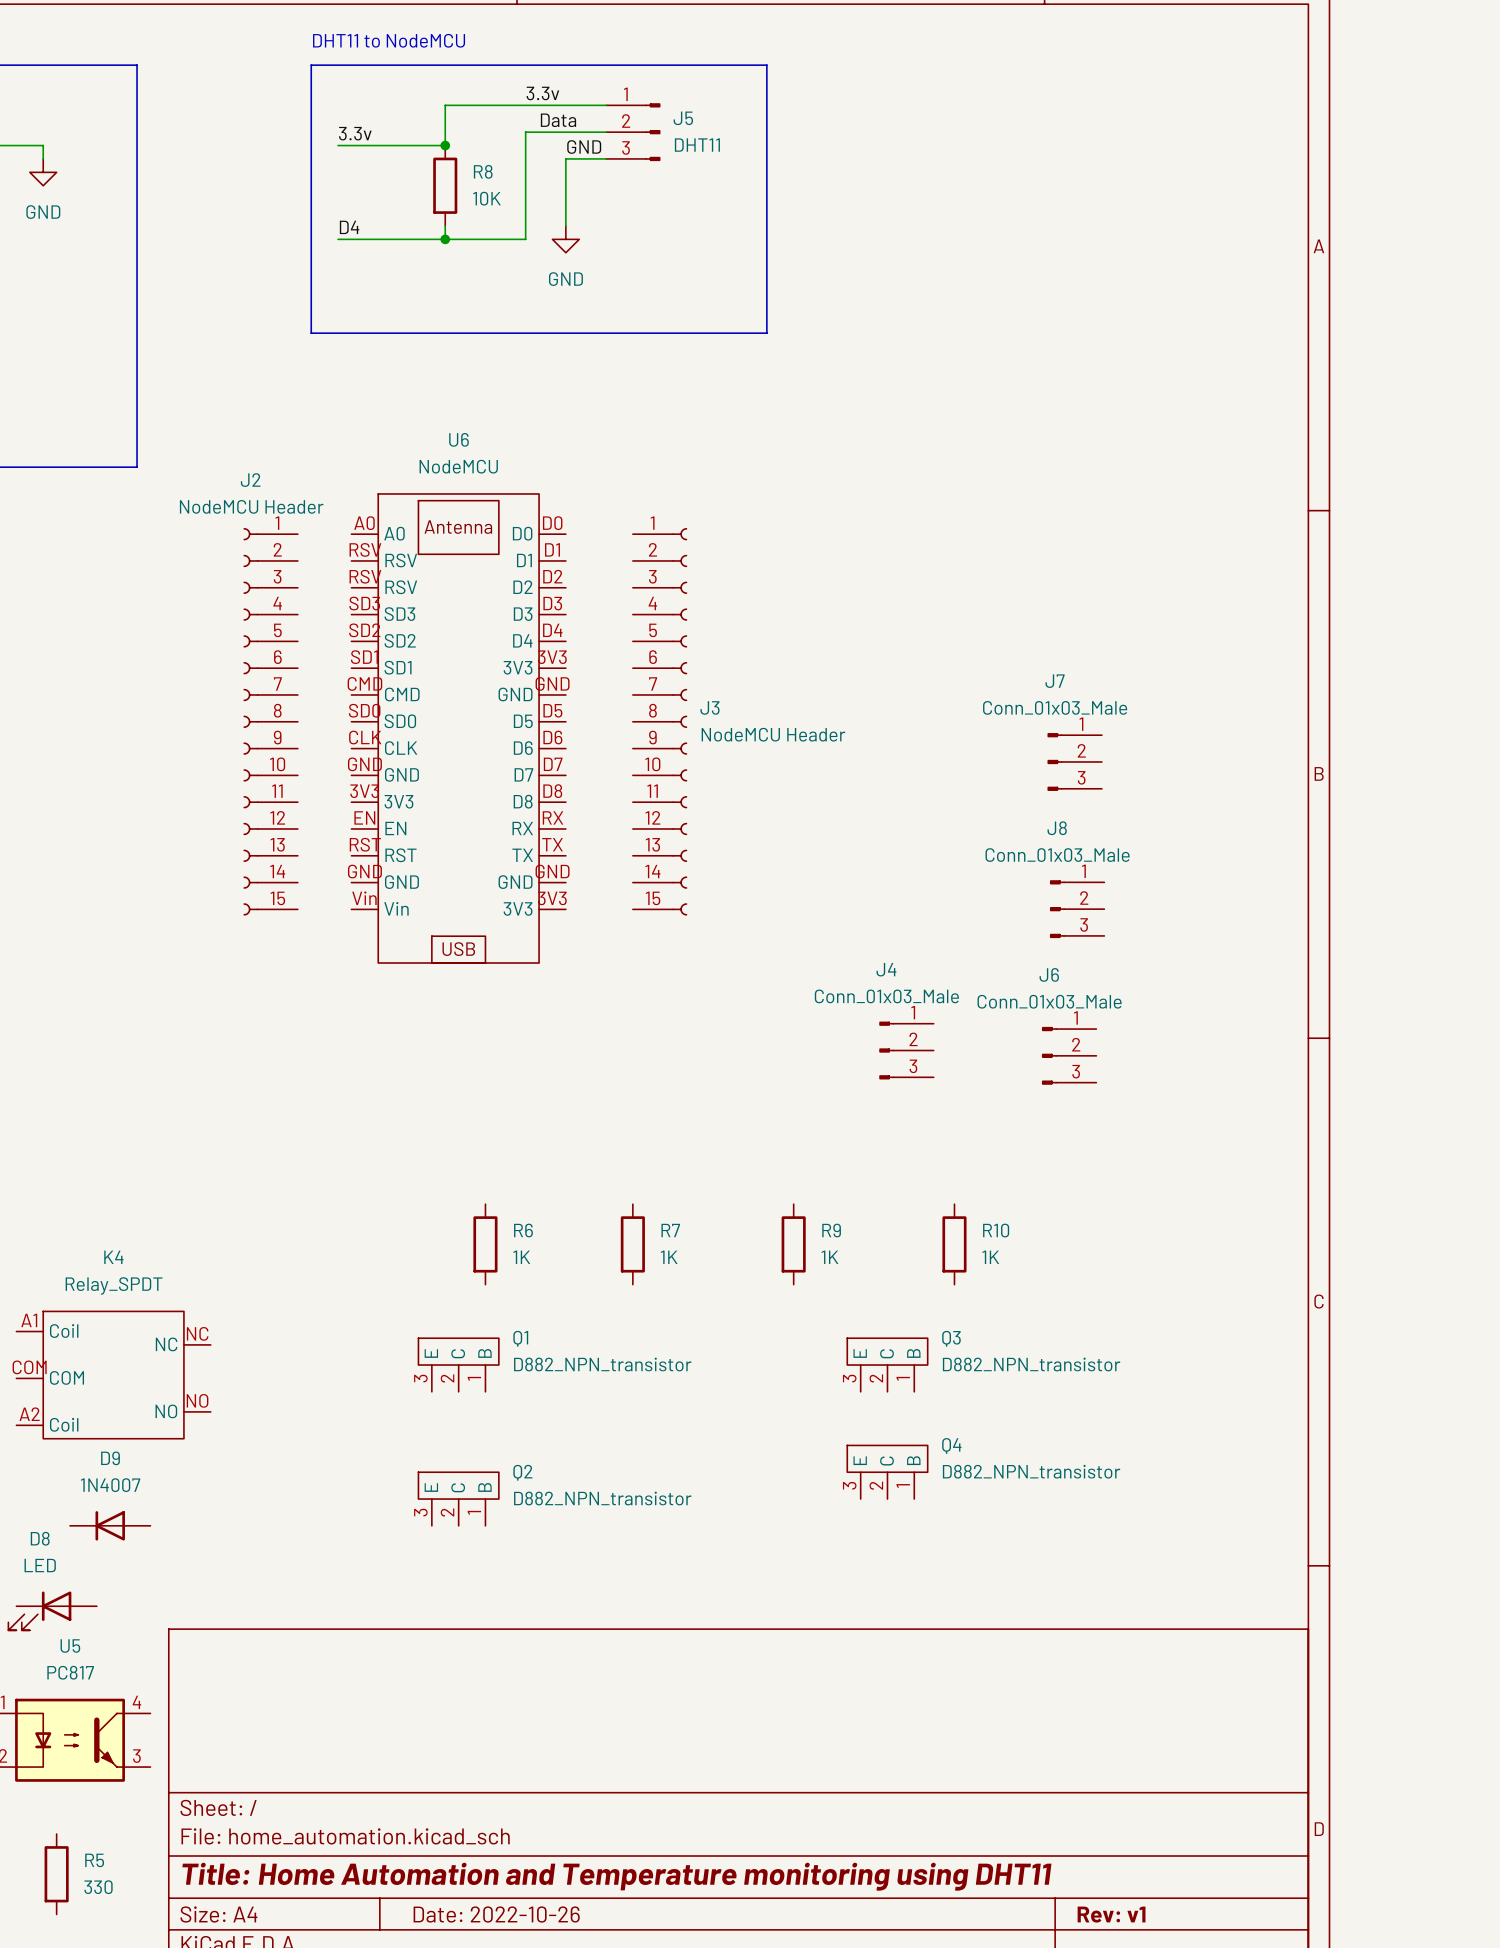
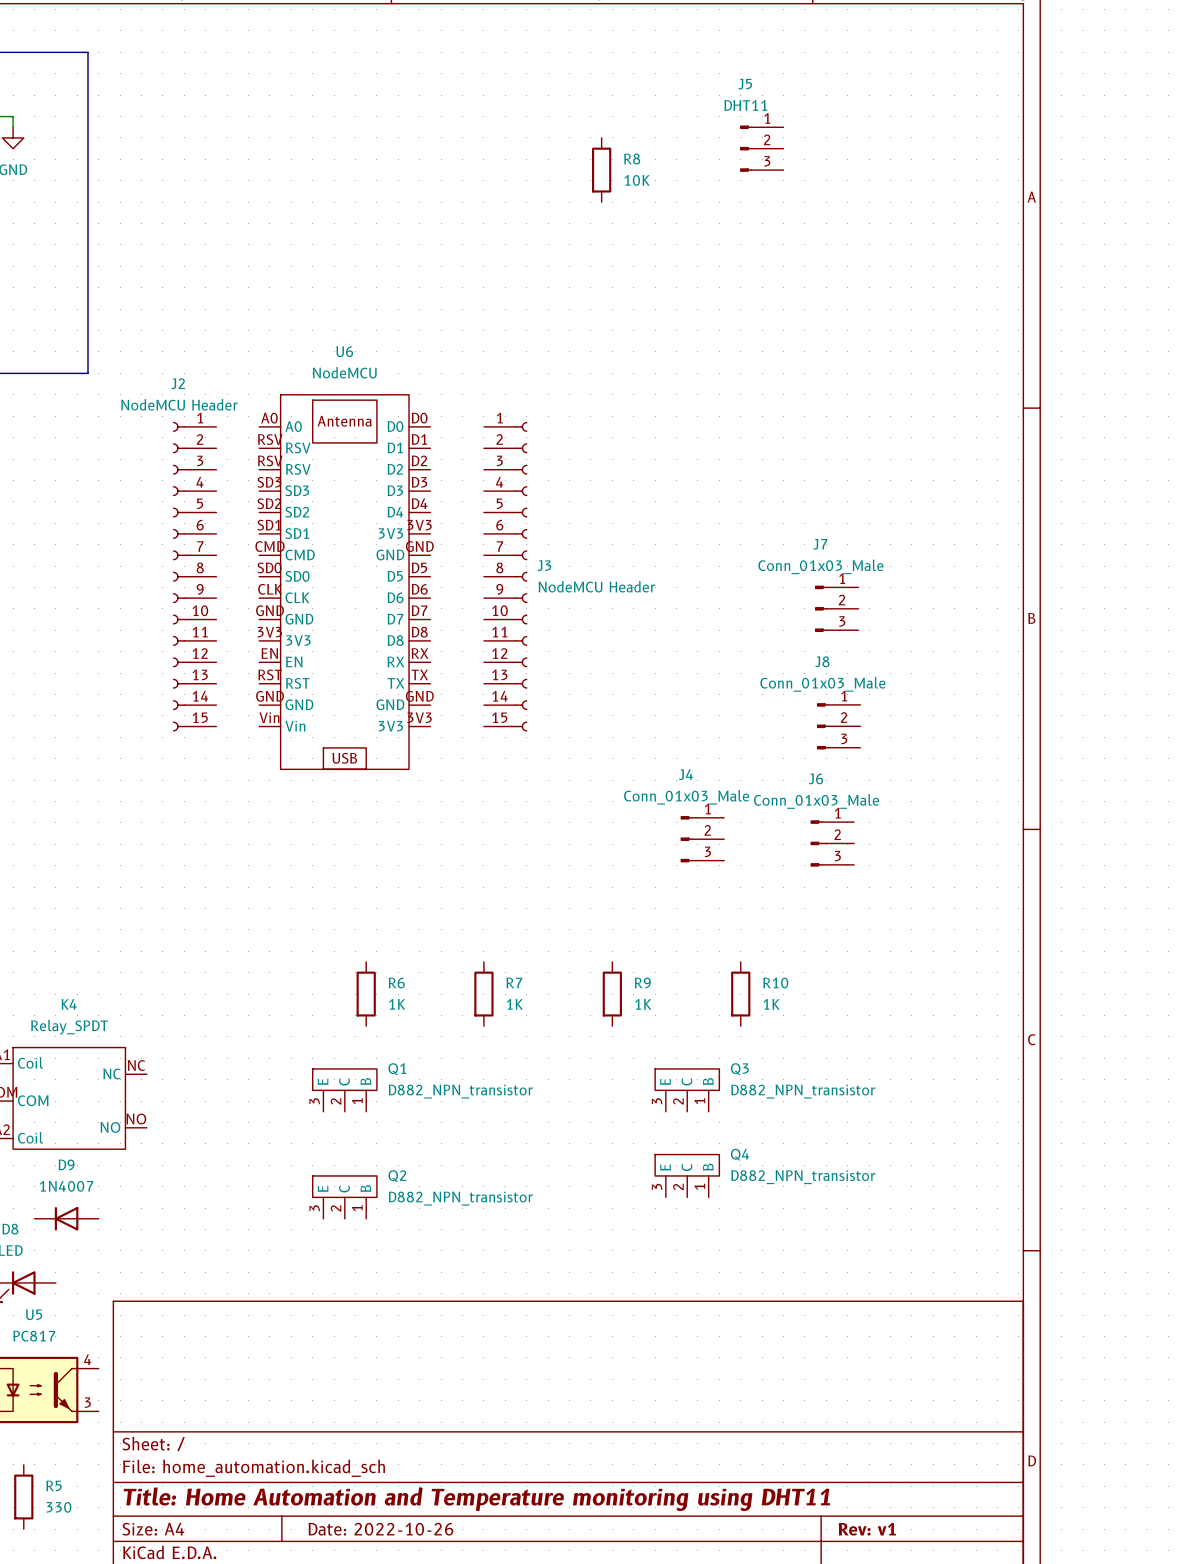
text: DHT11 to NodeMCU (389, 40) -> none
line: (311, 65) (766, 65) (766, 333) (311, 333) (311, 65) -> none
label: 3.3v (542, 93) -> none
wire: (606, 105) (445, 105) (445, 145) (338, 145) -> none
J5 name position: J5 (683, 118) -> J5 (745, 84)
label: Data (558, 120) -> none
wire: (606, 132) (525, 132) (525, 239) (338, 239) -> none
J5 position: (633, 132) -> (761, 148)
J5 flip: as is (652, 132) -> left-right (746, 148)
label: 3.3v (355, 133) -> none
junction: (445, 145) -> none
J5 value position: DHT11 (697, 145) -> DHT11 (745, 105)
label: GND (584, 147) -> none
wire: (606, 158) (565, 158) (565, 225) -> none
R8 position: (445, 185) -> (601, 170)
wire: (445, 225) (445, 239) -> none
label: D4 (349, 227) -> none
junction: (445, 239) -> none
power symbol: GND (565, 239) -> none

